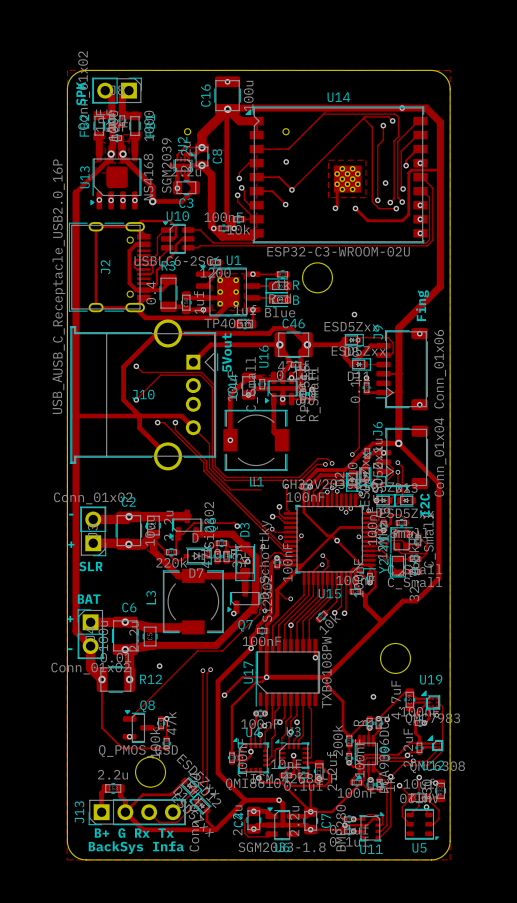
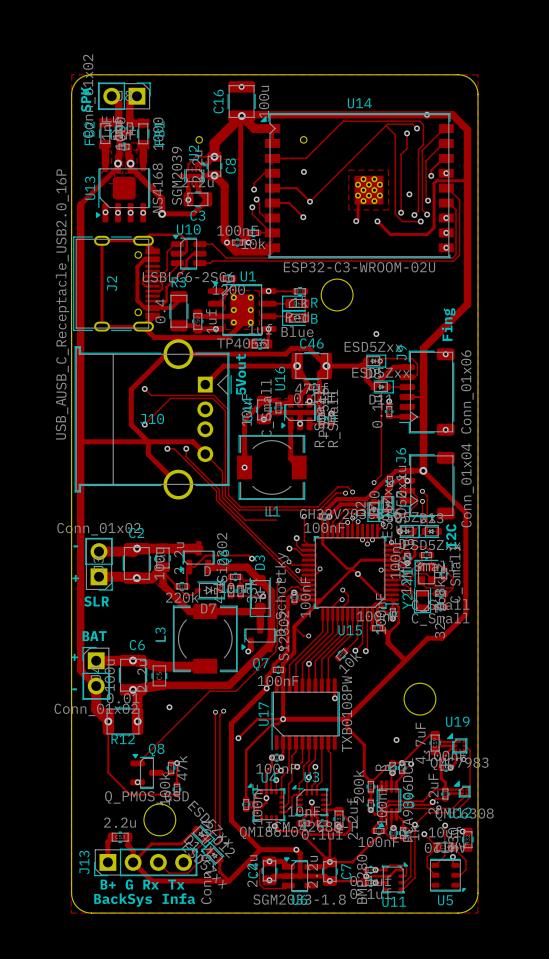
R12 name position: R12 (151, 679) -> R12 (123, 739)

